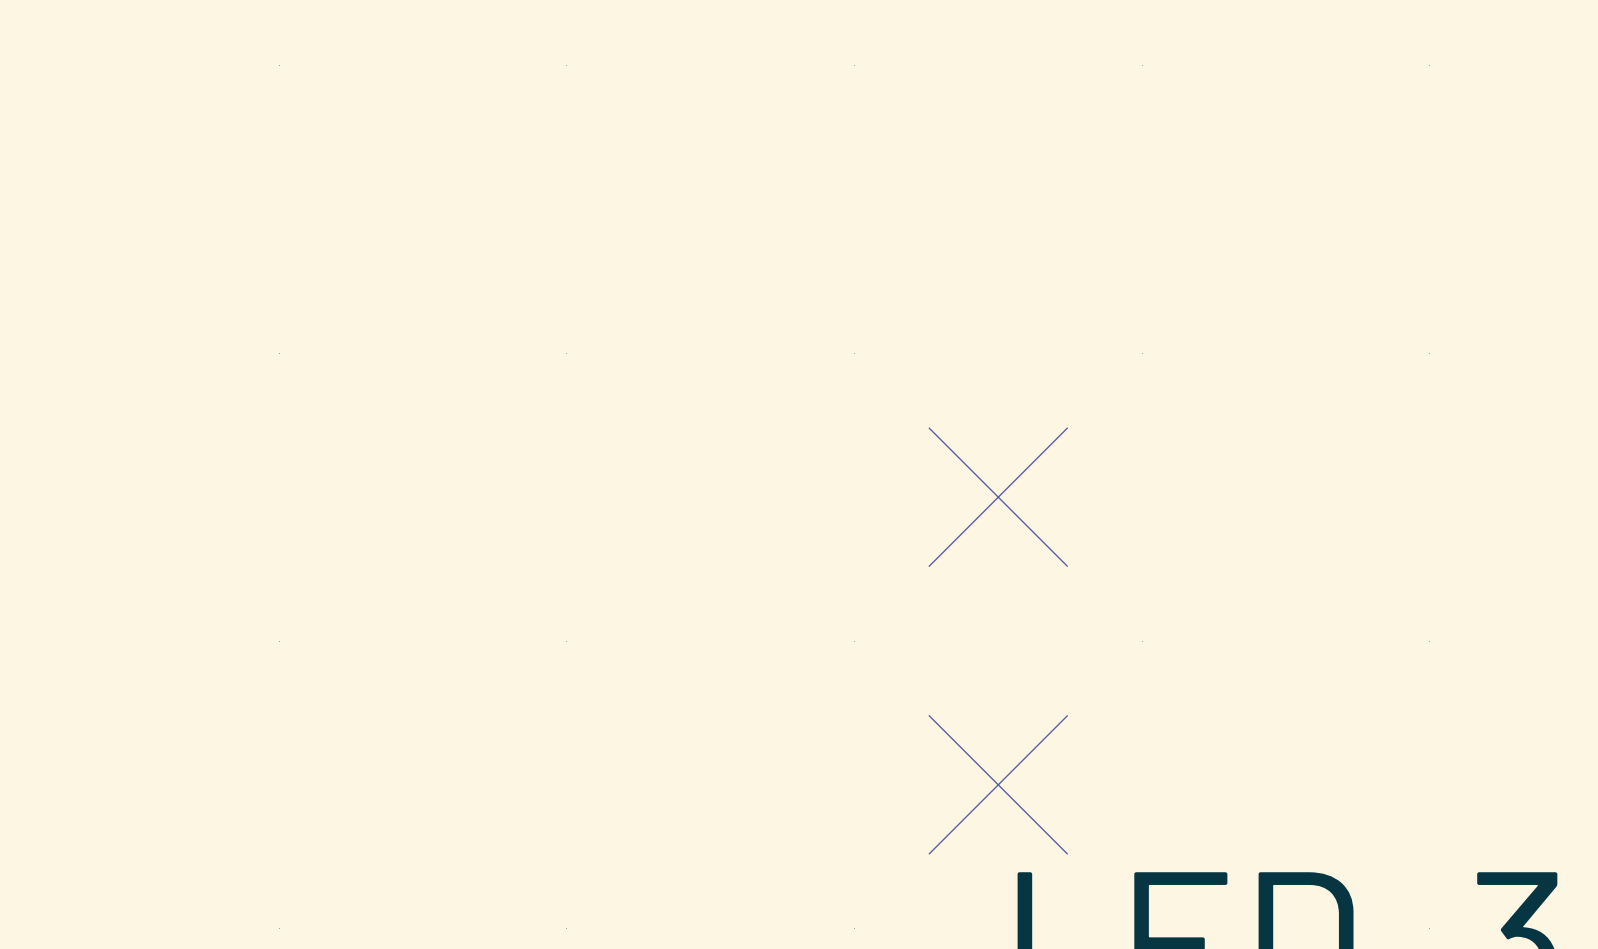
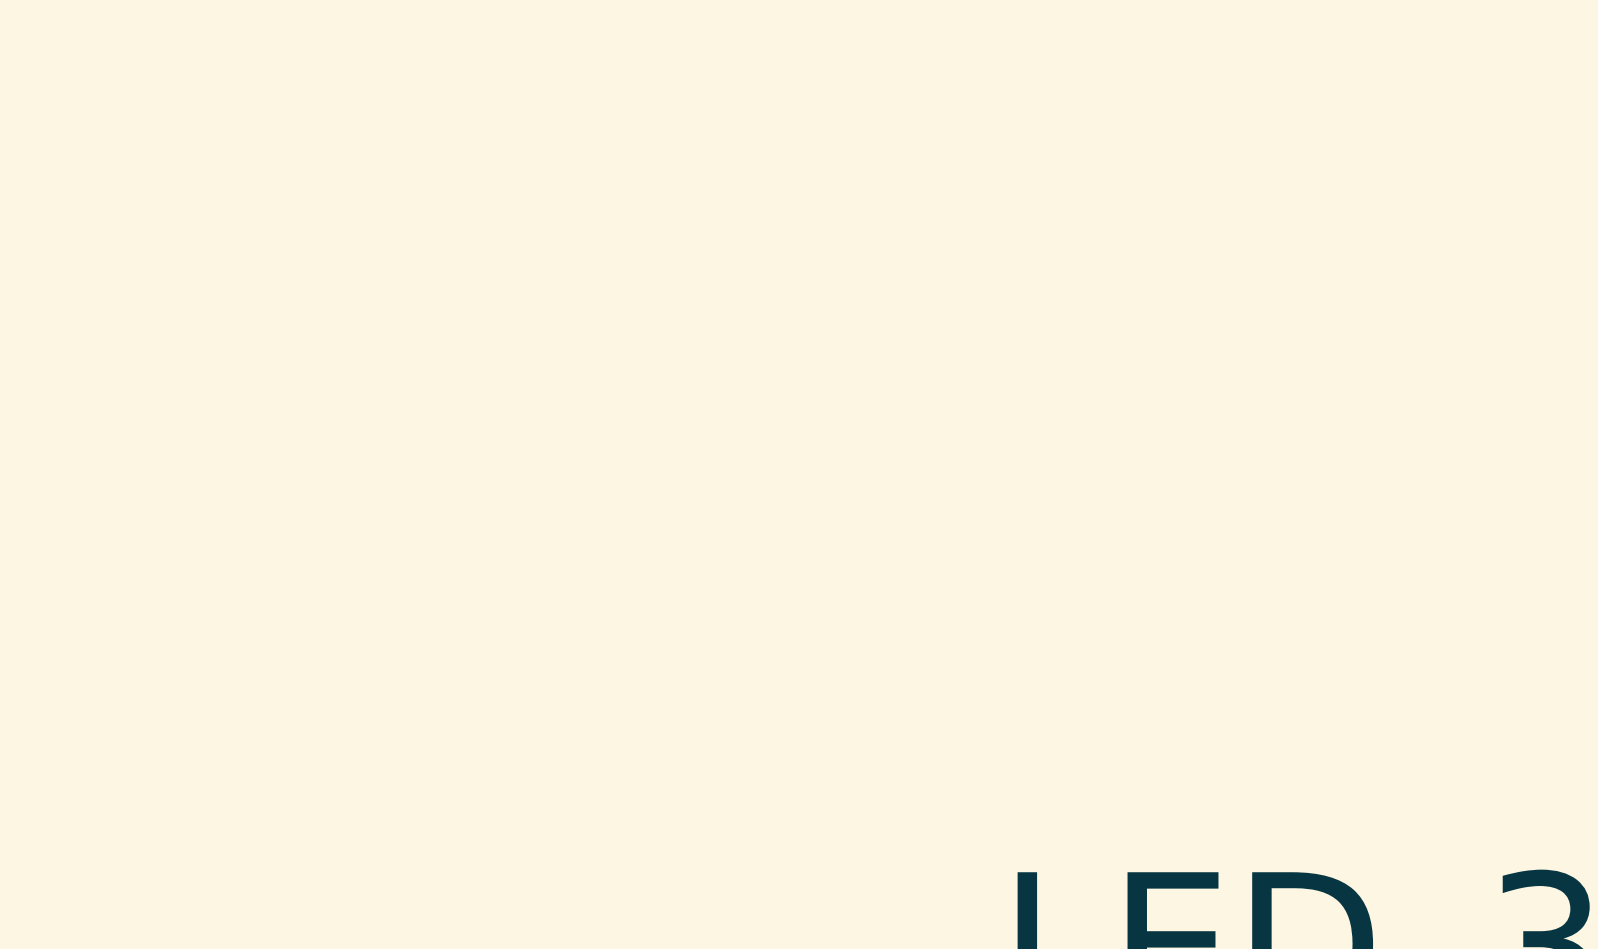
no-connect mark: (998, 497) -> none
no-connect mark: (998, 784) -> none

